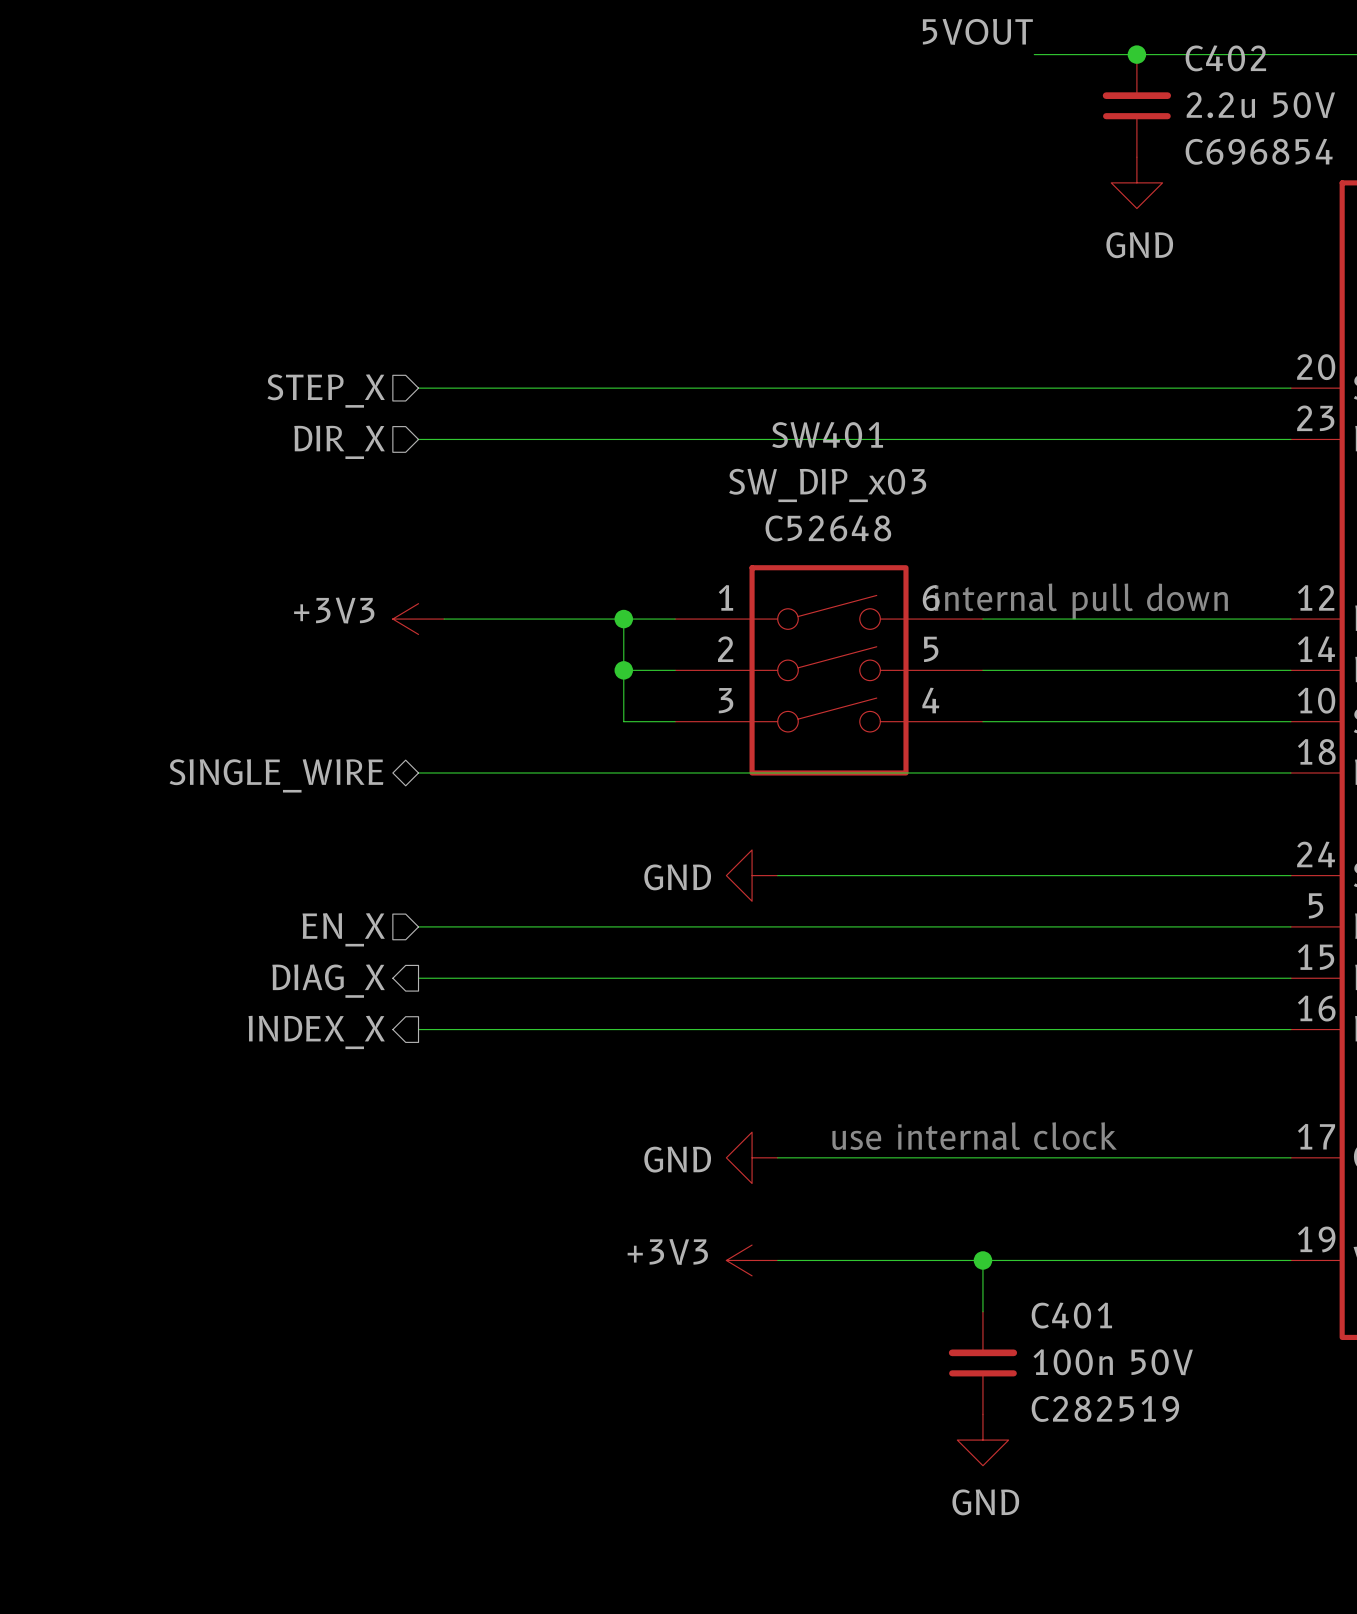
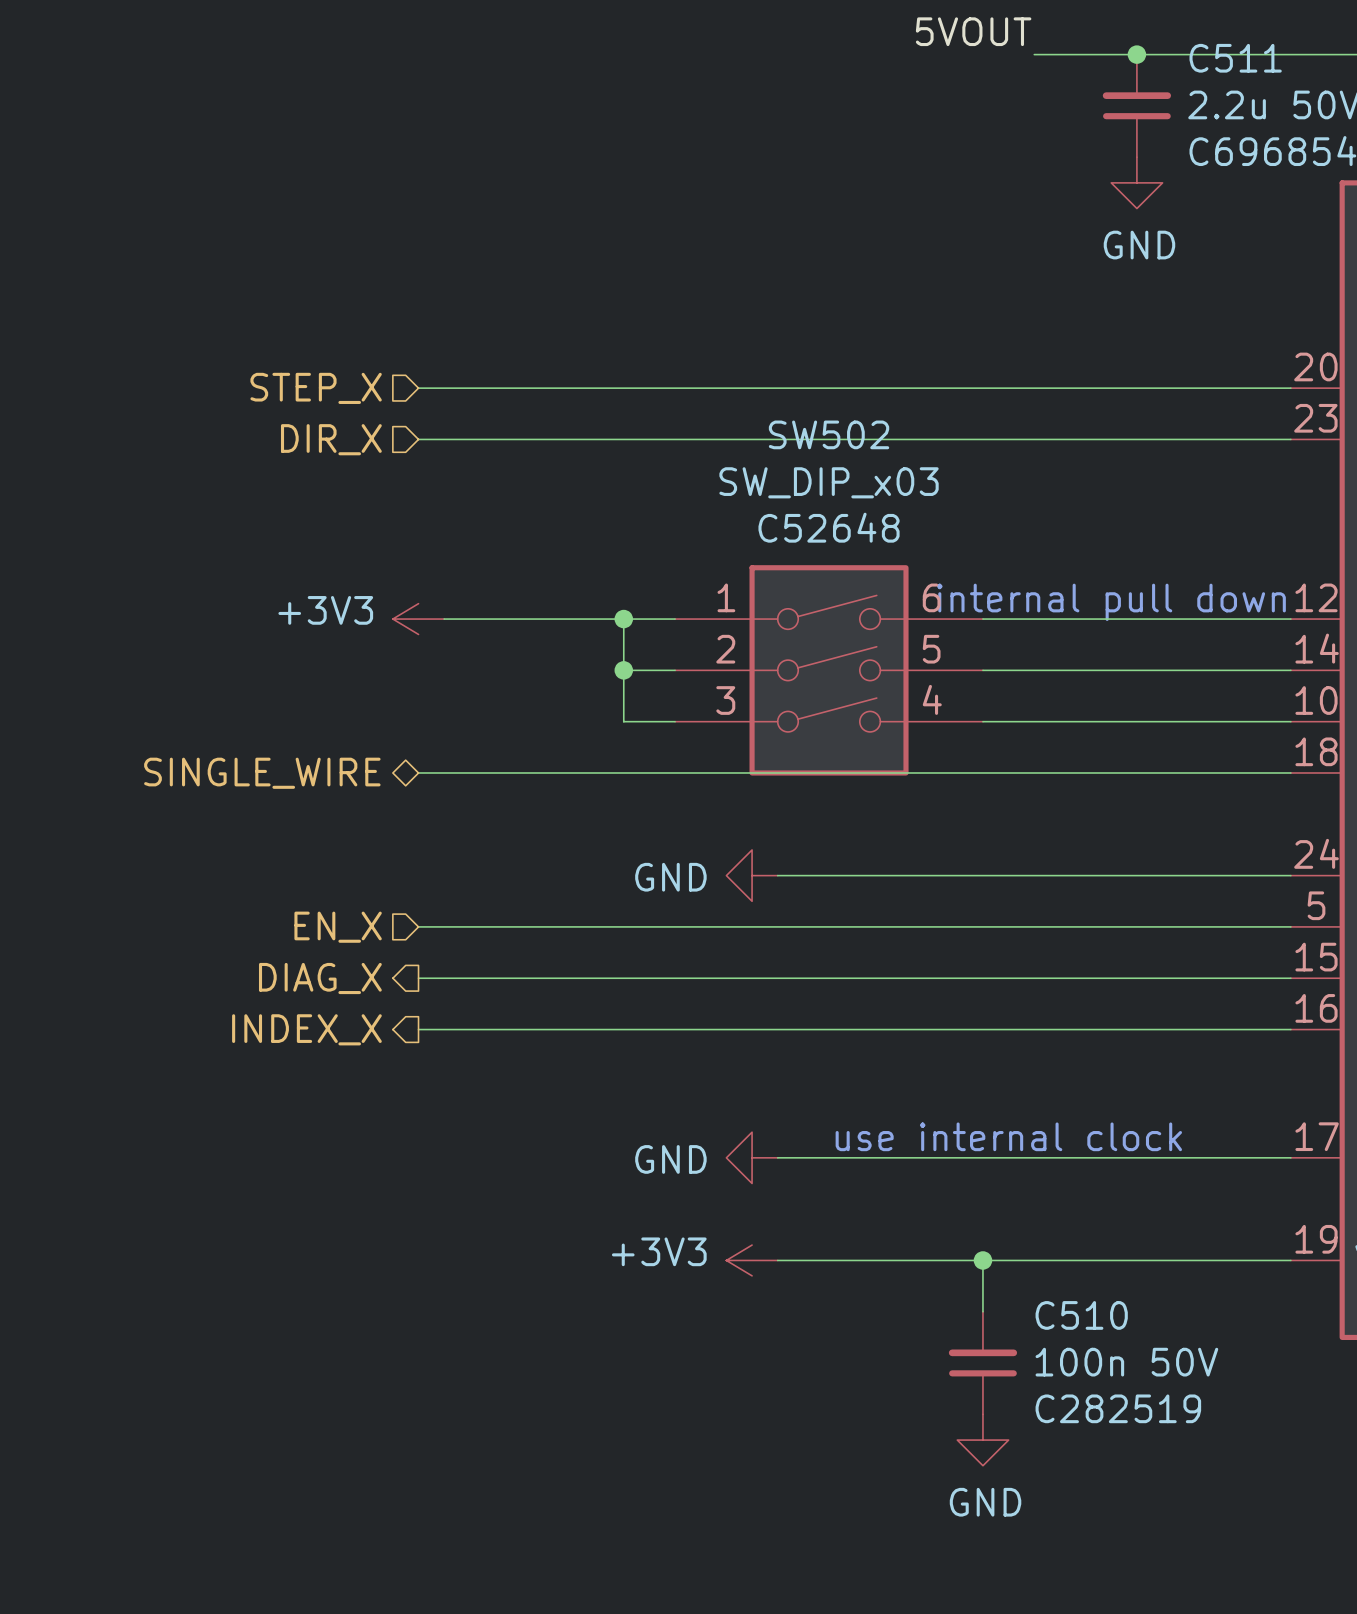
C402 name: C402 (1225, 58) -> C511 (1235, 58)
SW401 name: SW401 (827, 435) -> SW502 (829, 434)
C401 name: C401 (1071, 1315) -> C510 (1081, 1315)

